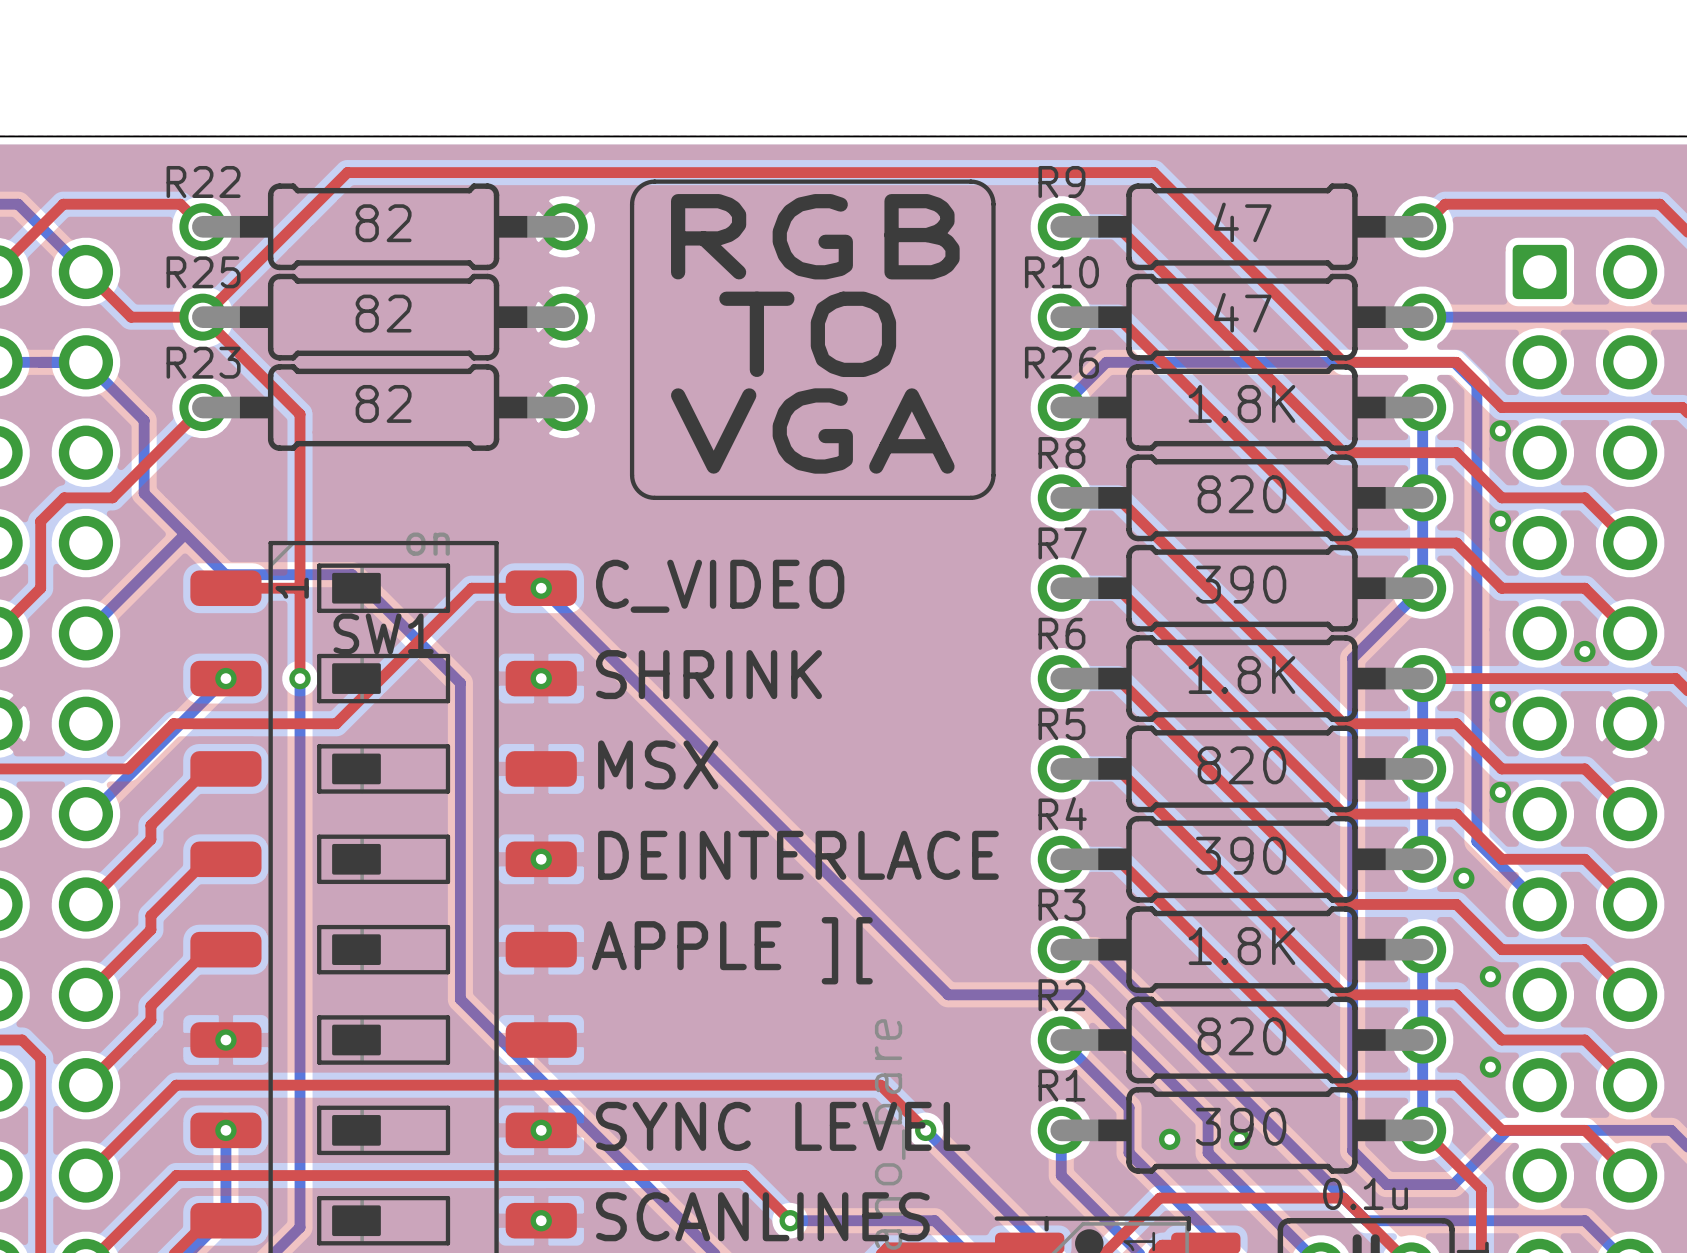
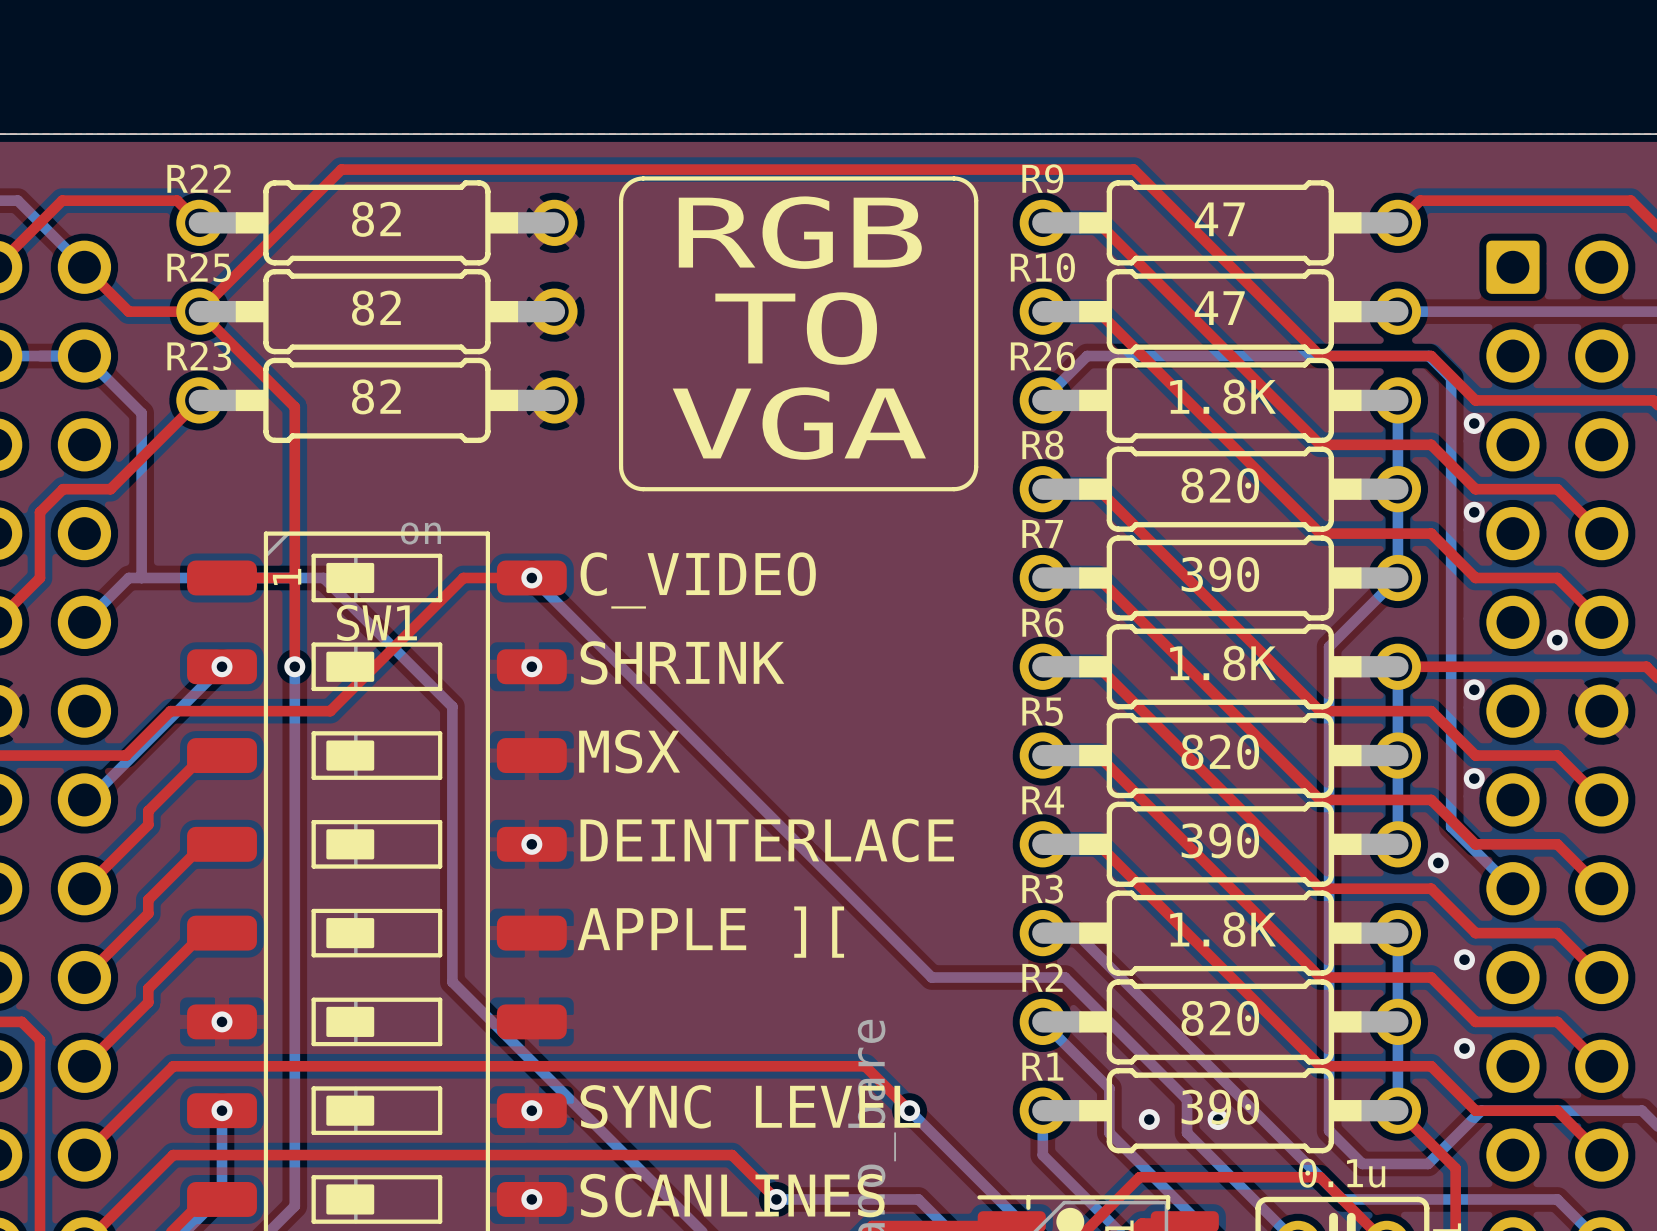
bottom track: (144, 493) (225, 574) (351, 574) (460, 683) (460, 719) -> (128, 577) (323, 577) (452, 706)
bottom track: none -> (141, 484) (141, 577)
bottom track: (184, 534) (131, 588) -> none

